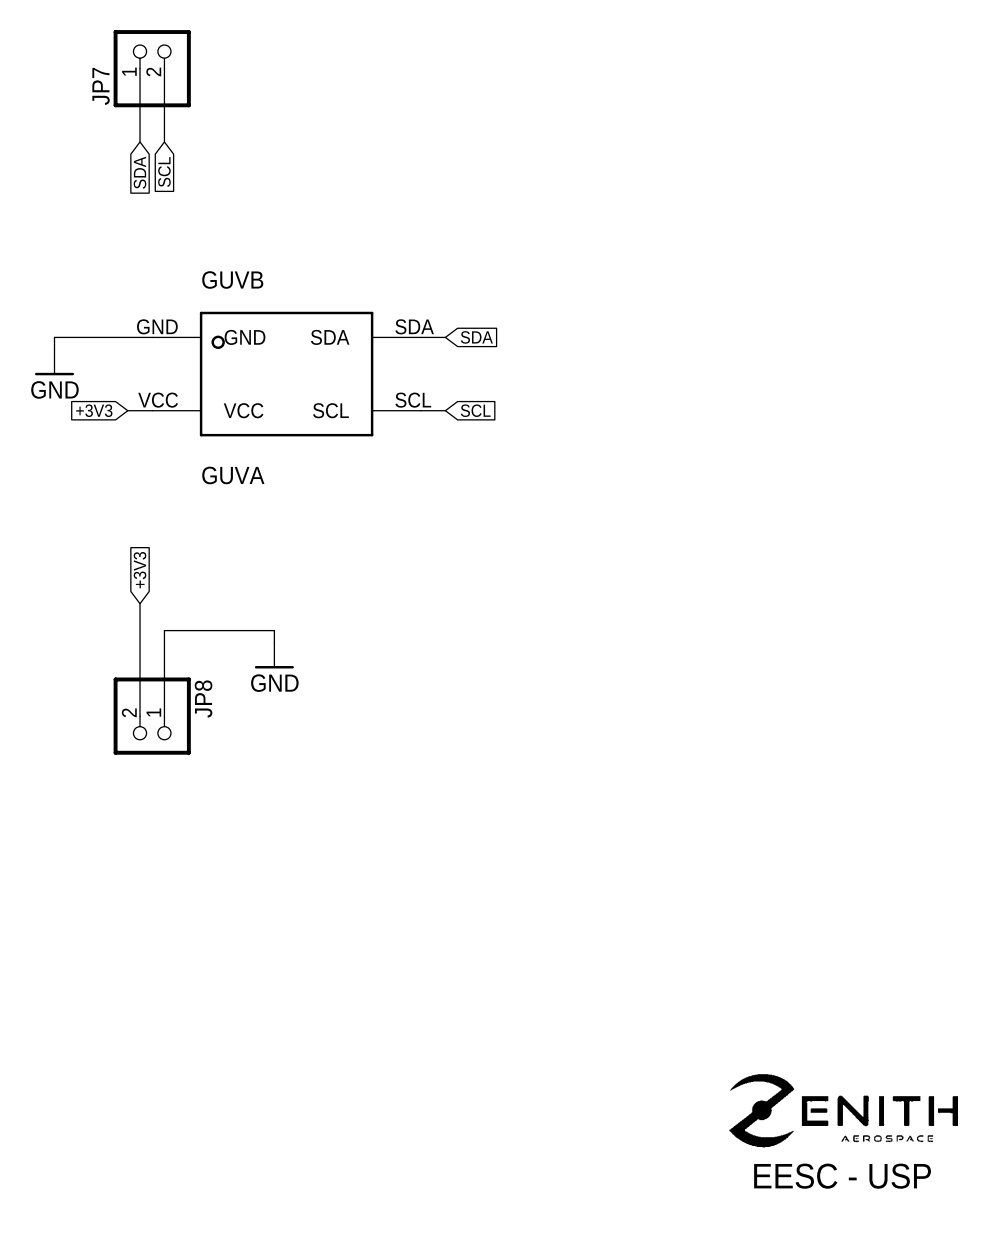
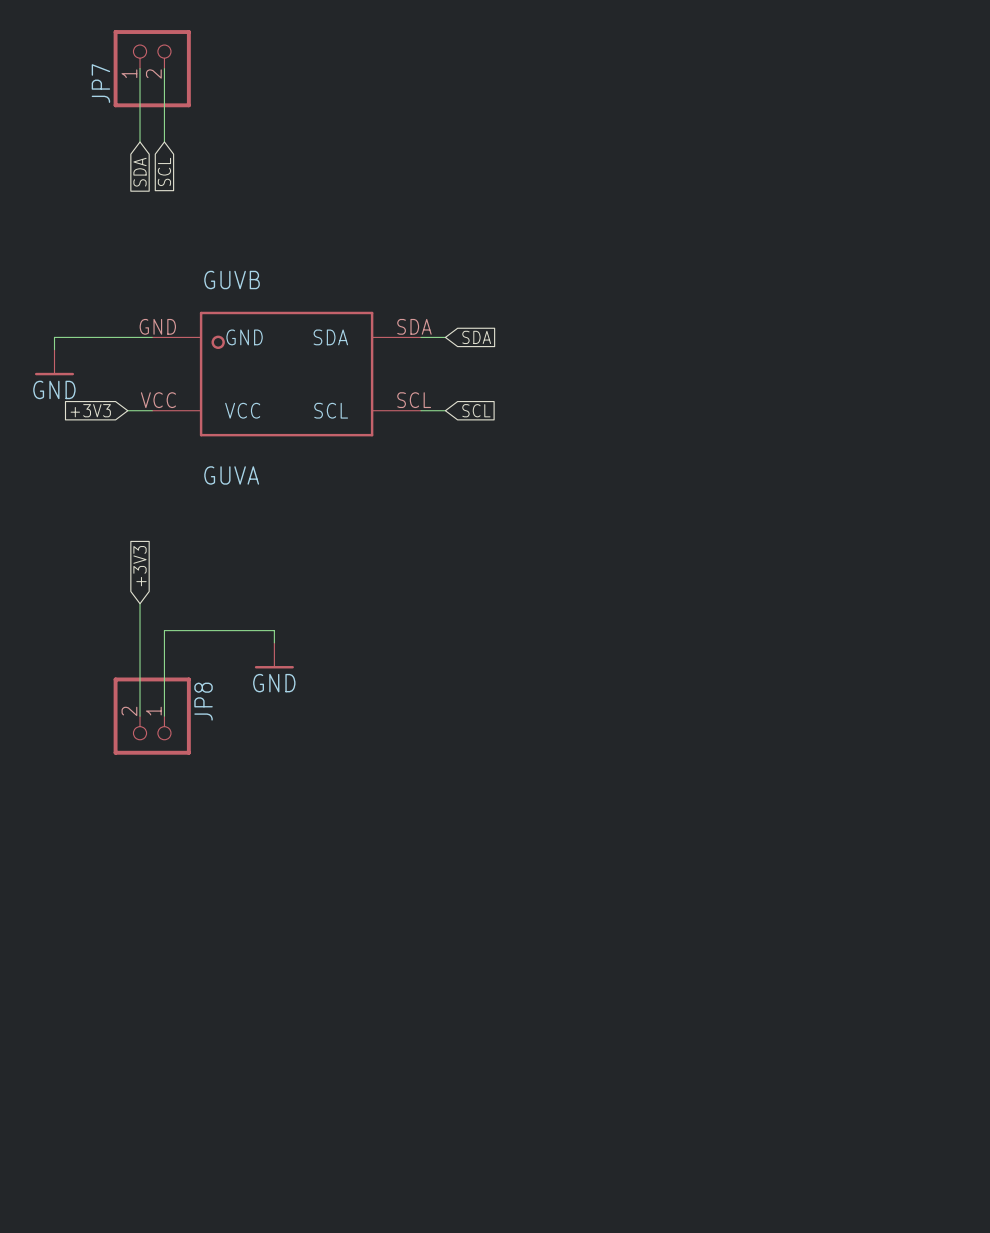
drawing: [729, 1074, 959, 1148] -> none
text: EESC - USP (842, 1176) -> none

